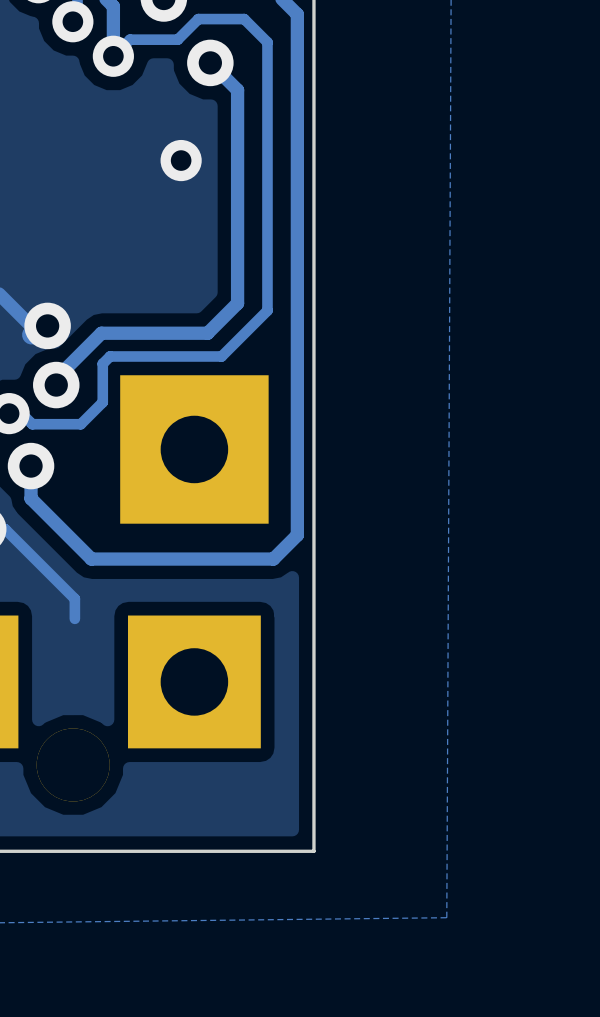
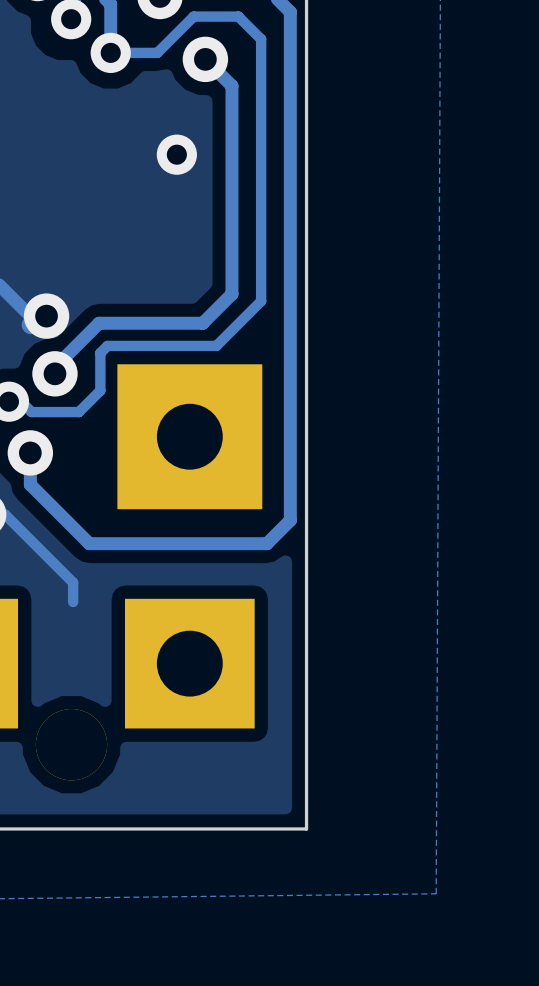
track: (177, 39) (129, 39) (113, 56) -> (173, 36) (157, 52) (110, 52)

